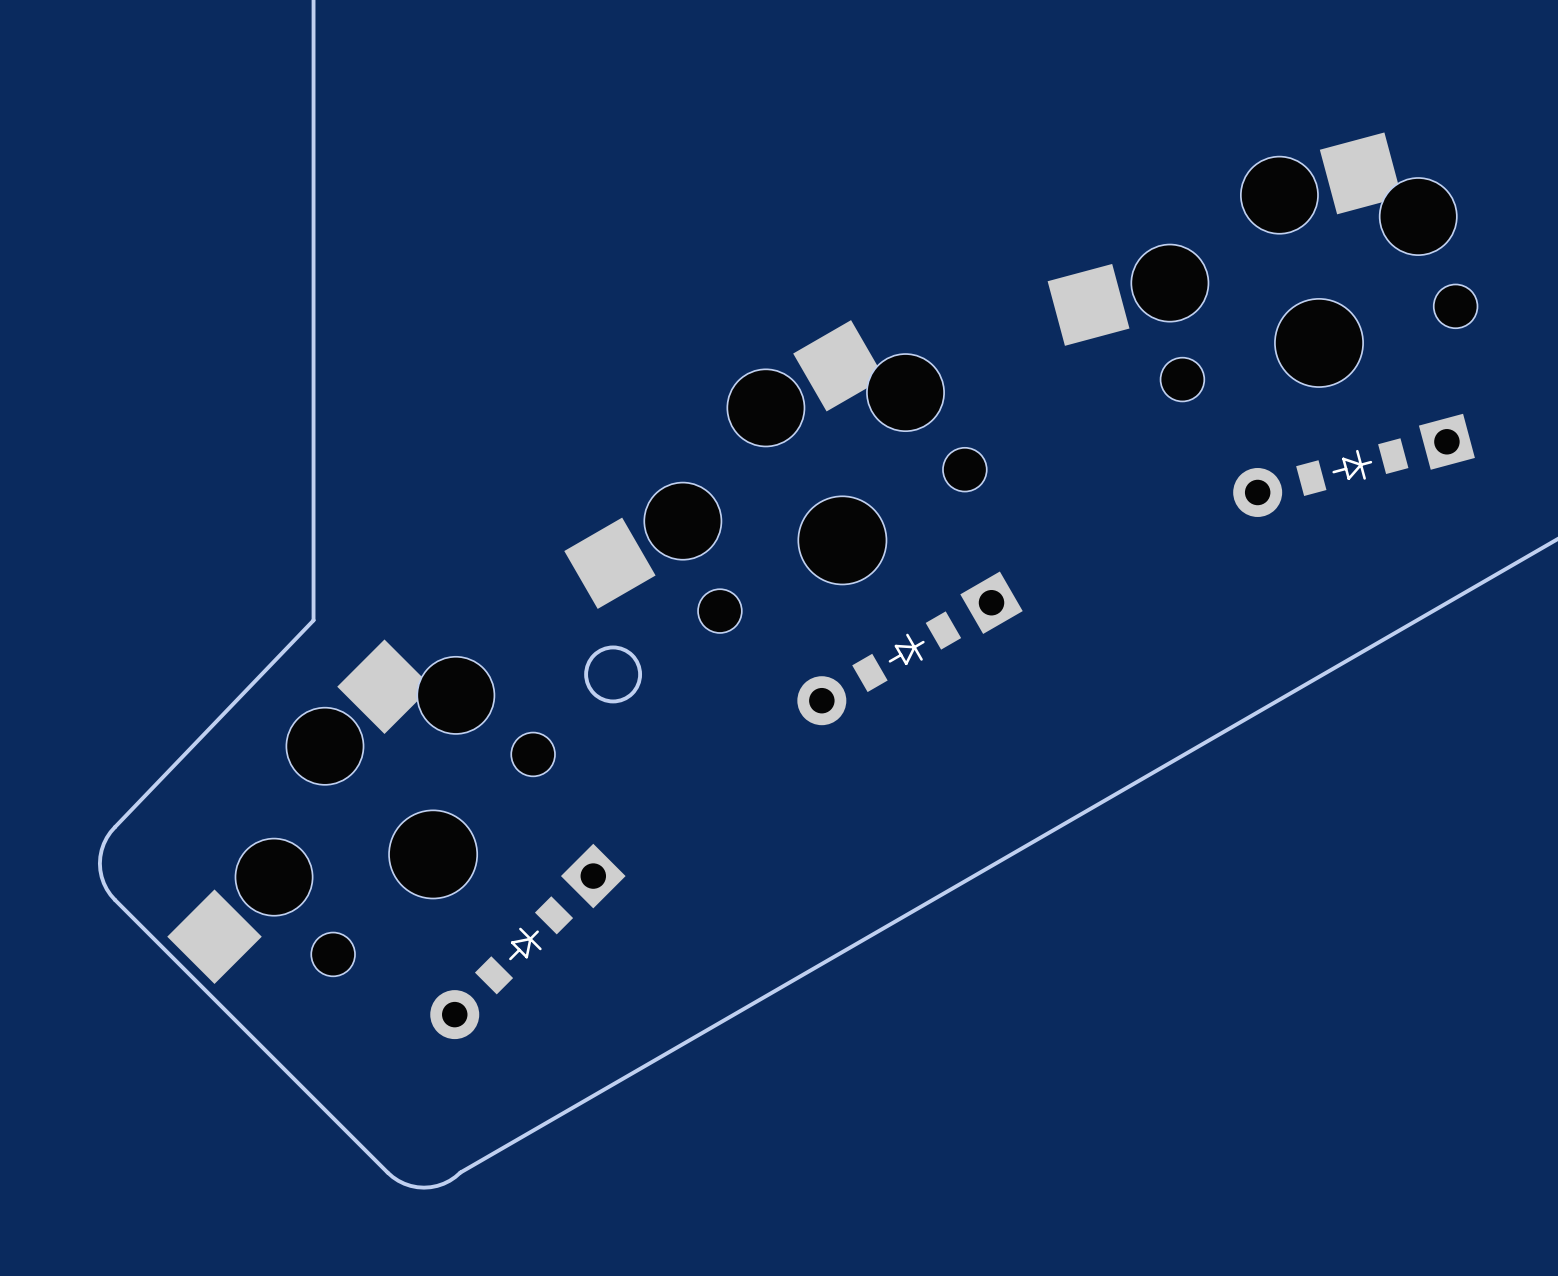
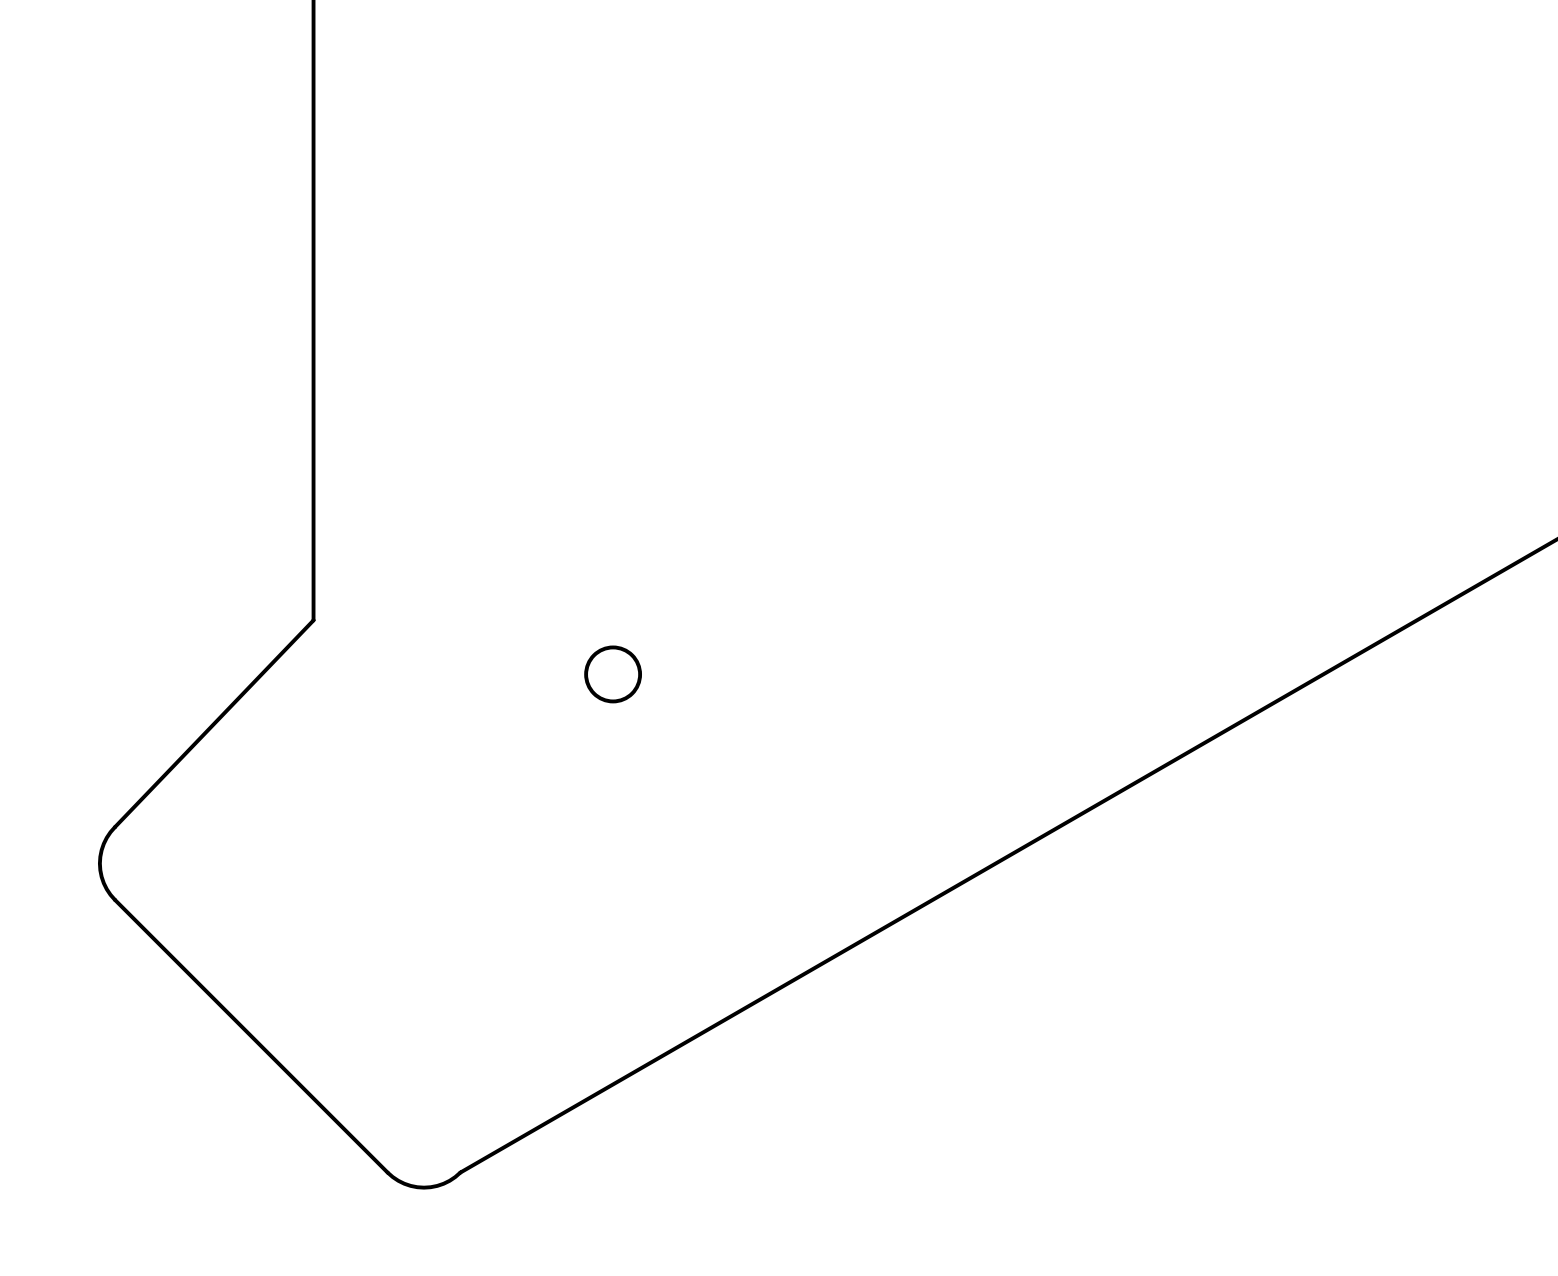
part: (1262, 266) -> none
part: (1354, 465) -> none
part: (775, 476) -> none
part: (910, 648) -> none
part: (361, 811) -> none
part: (527, 941) -> none

